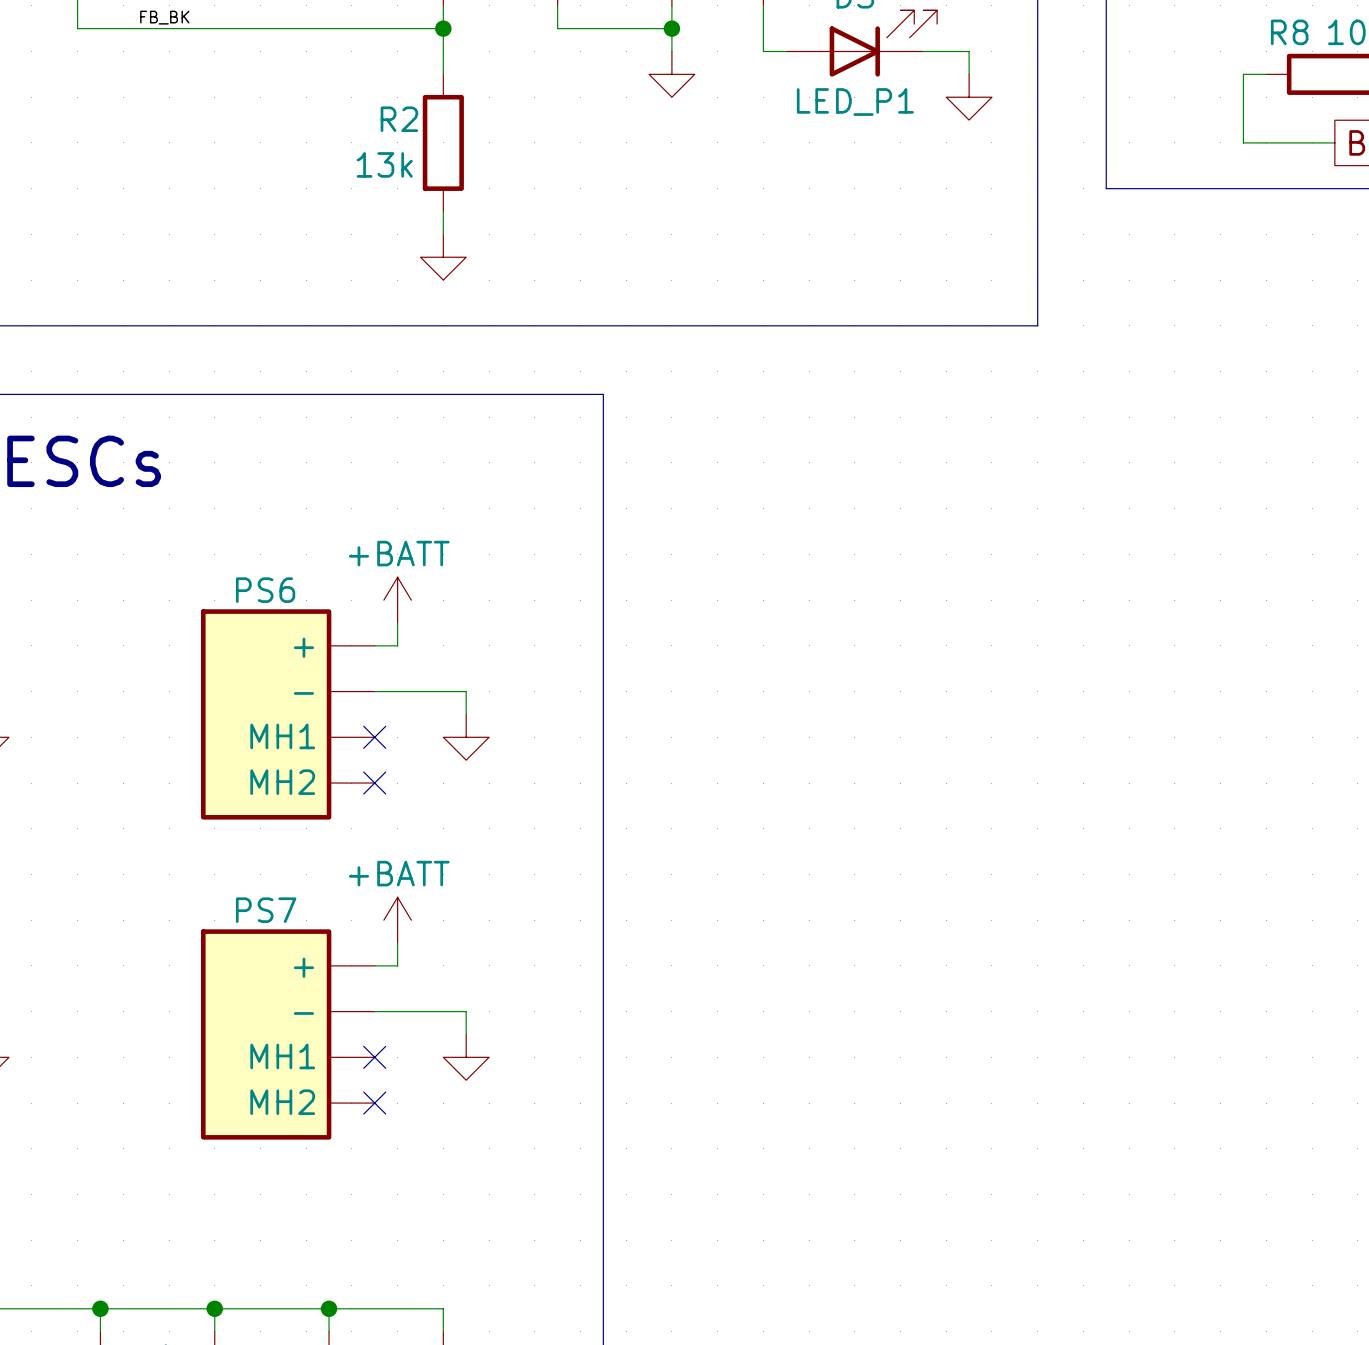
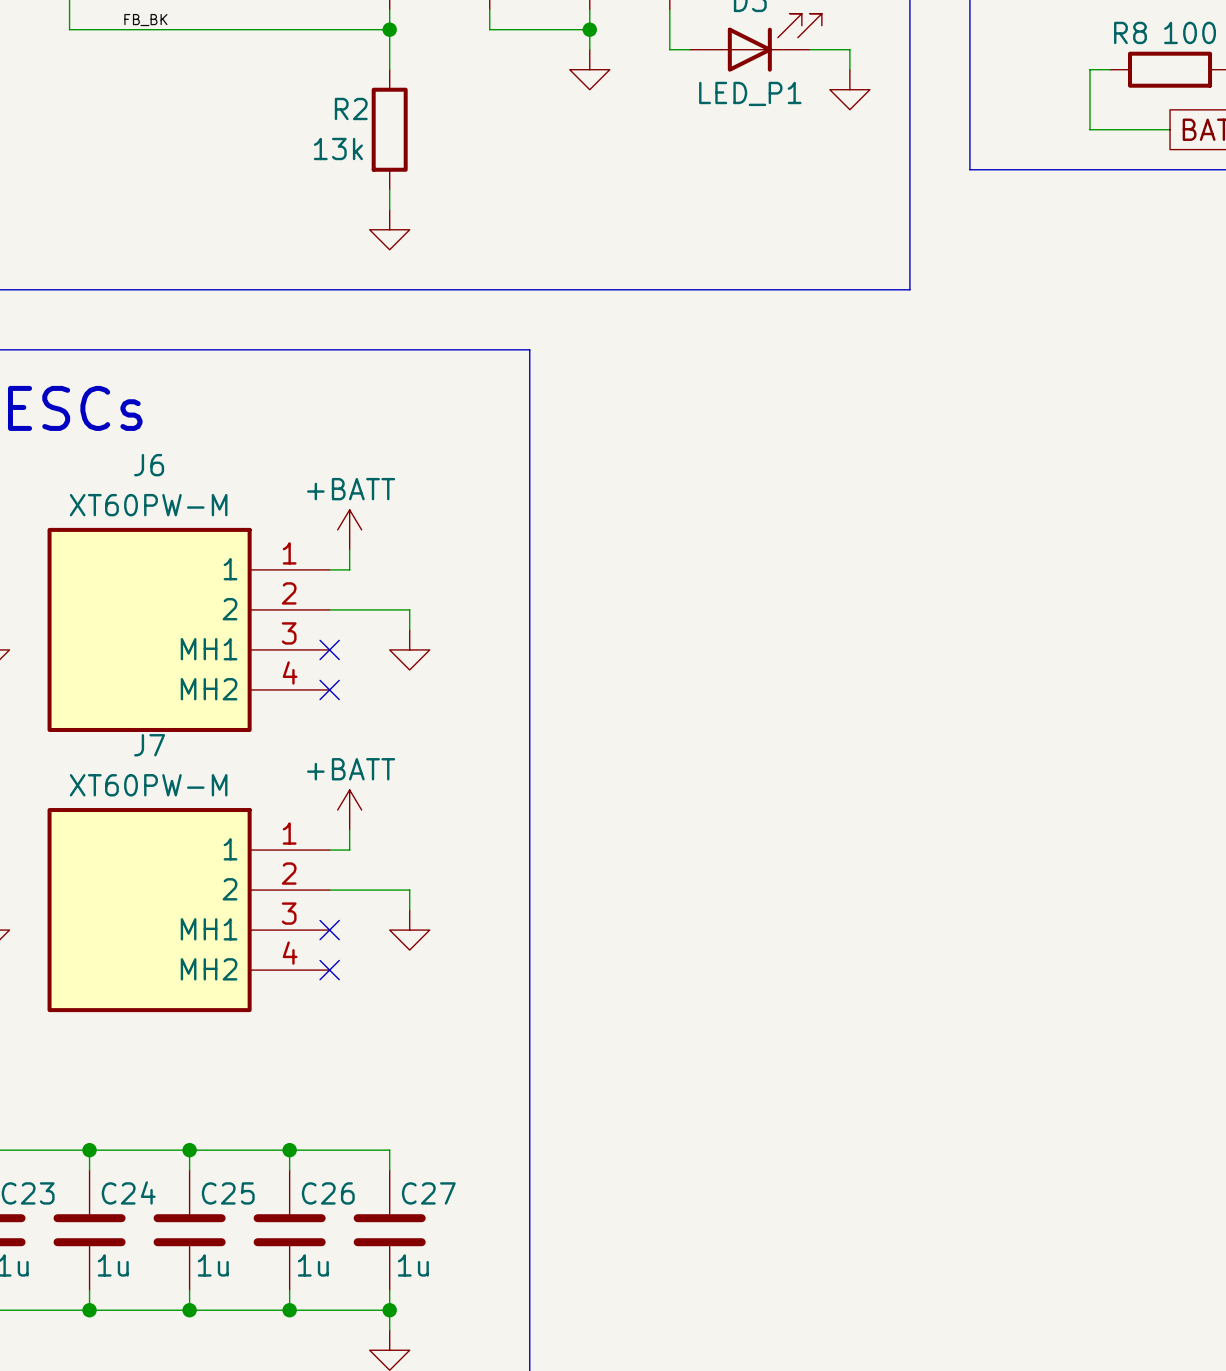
J6: none -> XT60PW-M (188, 629)
PS6: (287, 714) -> none
J7: none -> XT60PW-M (188, 910)
PS7: (287, 1034) -> none

